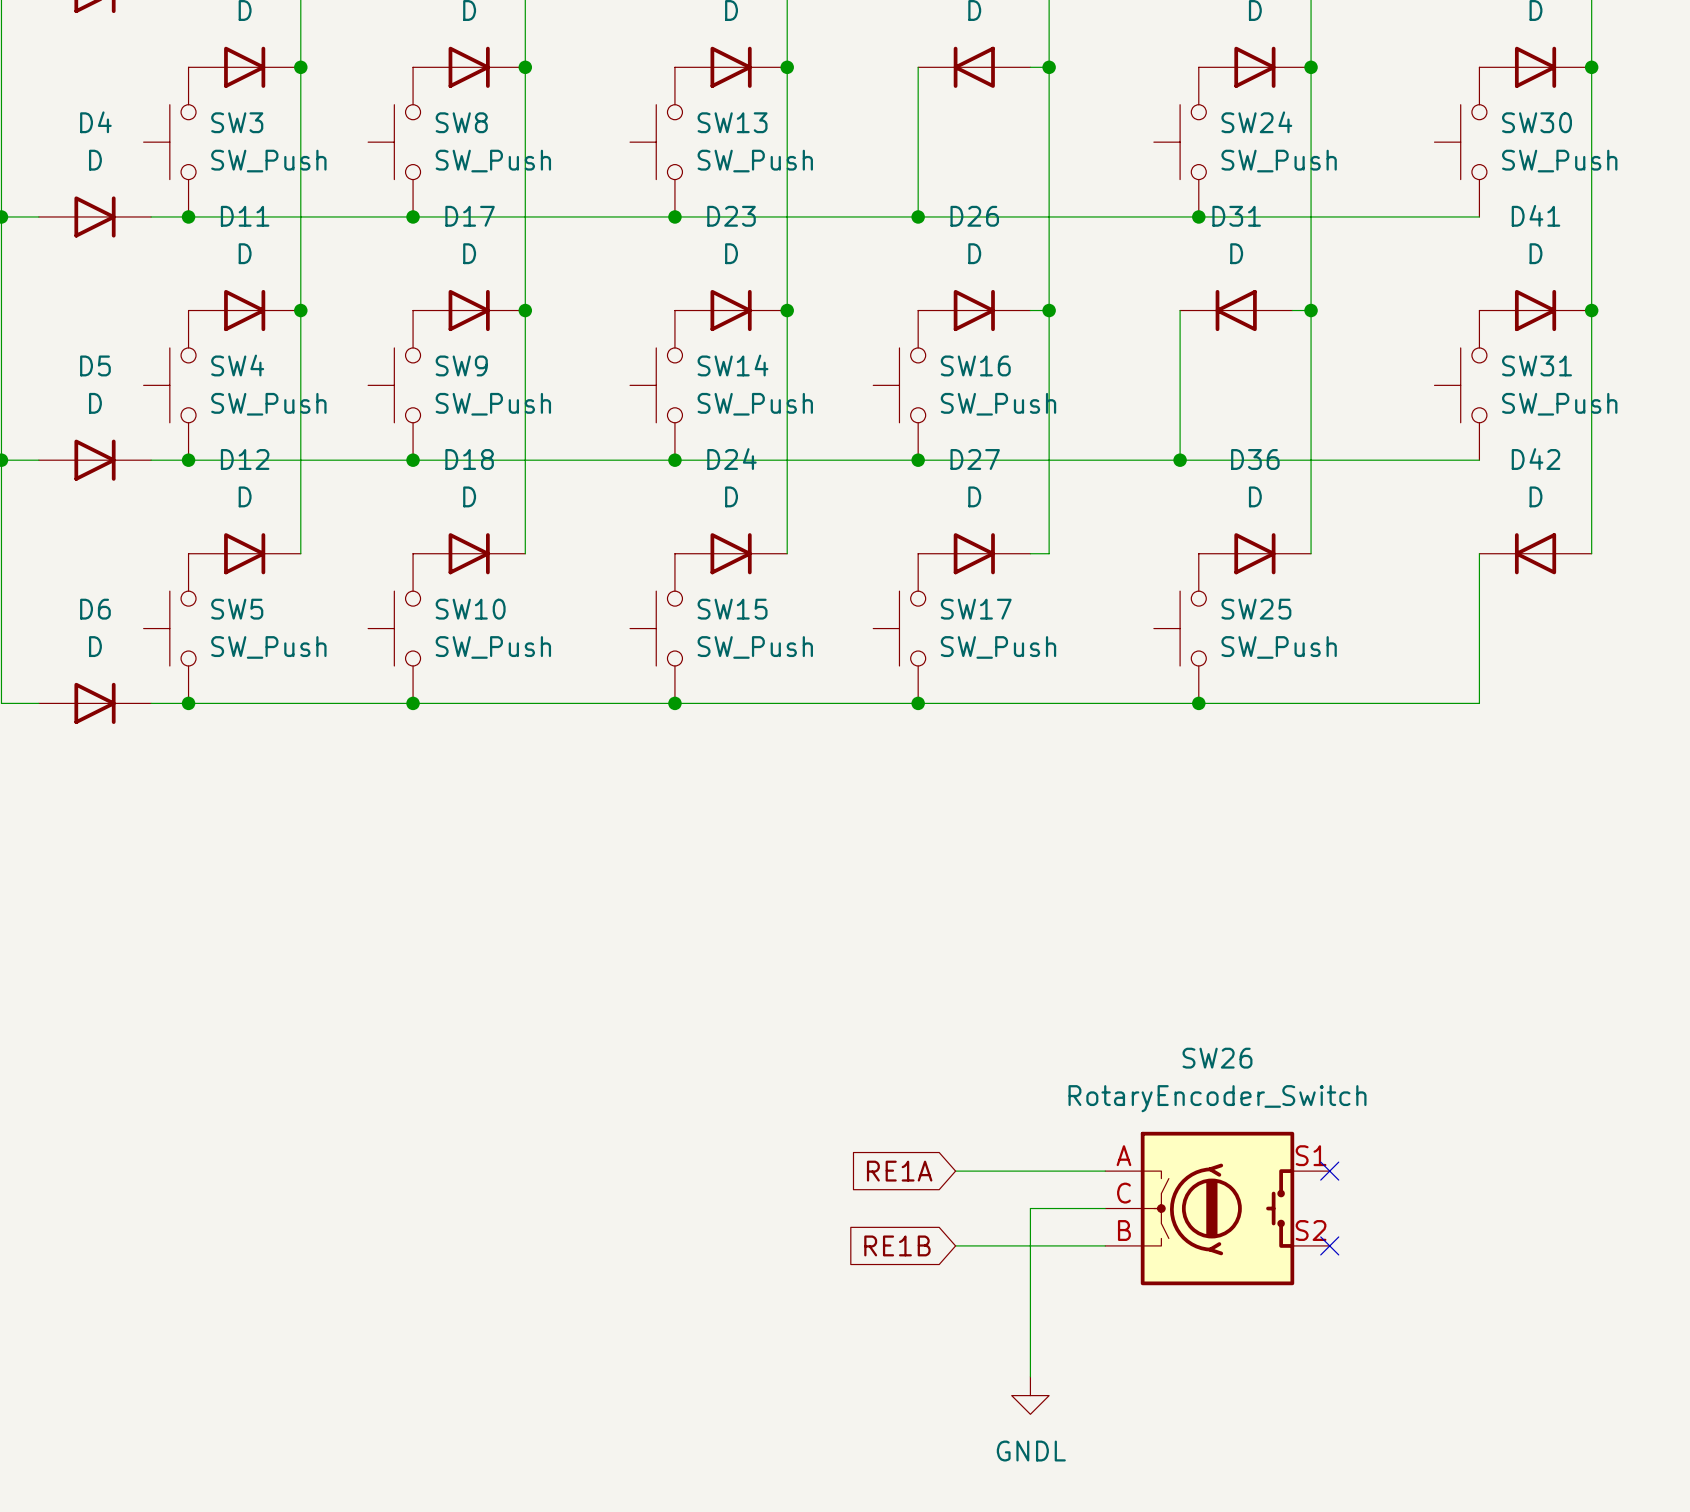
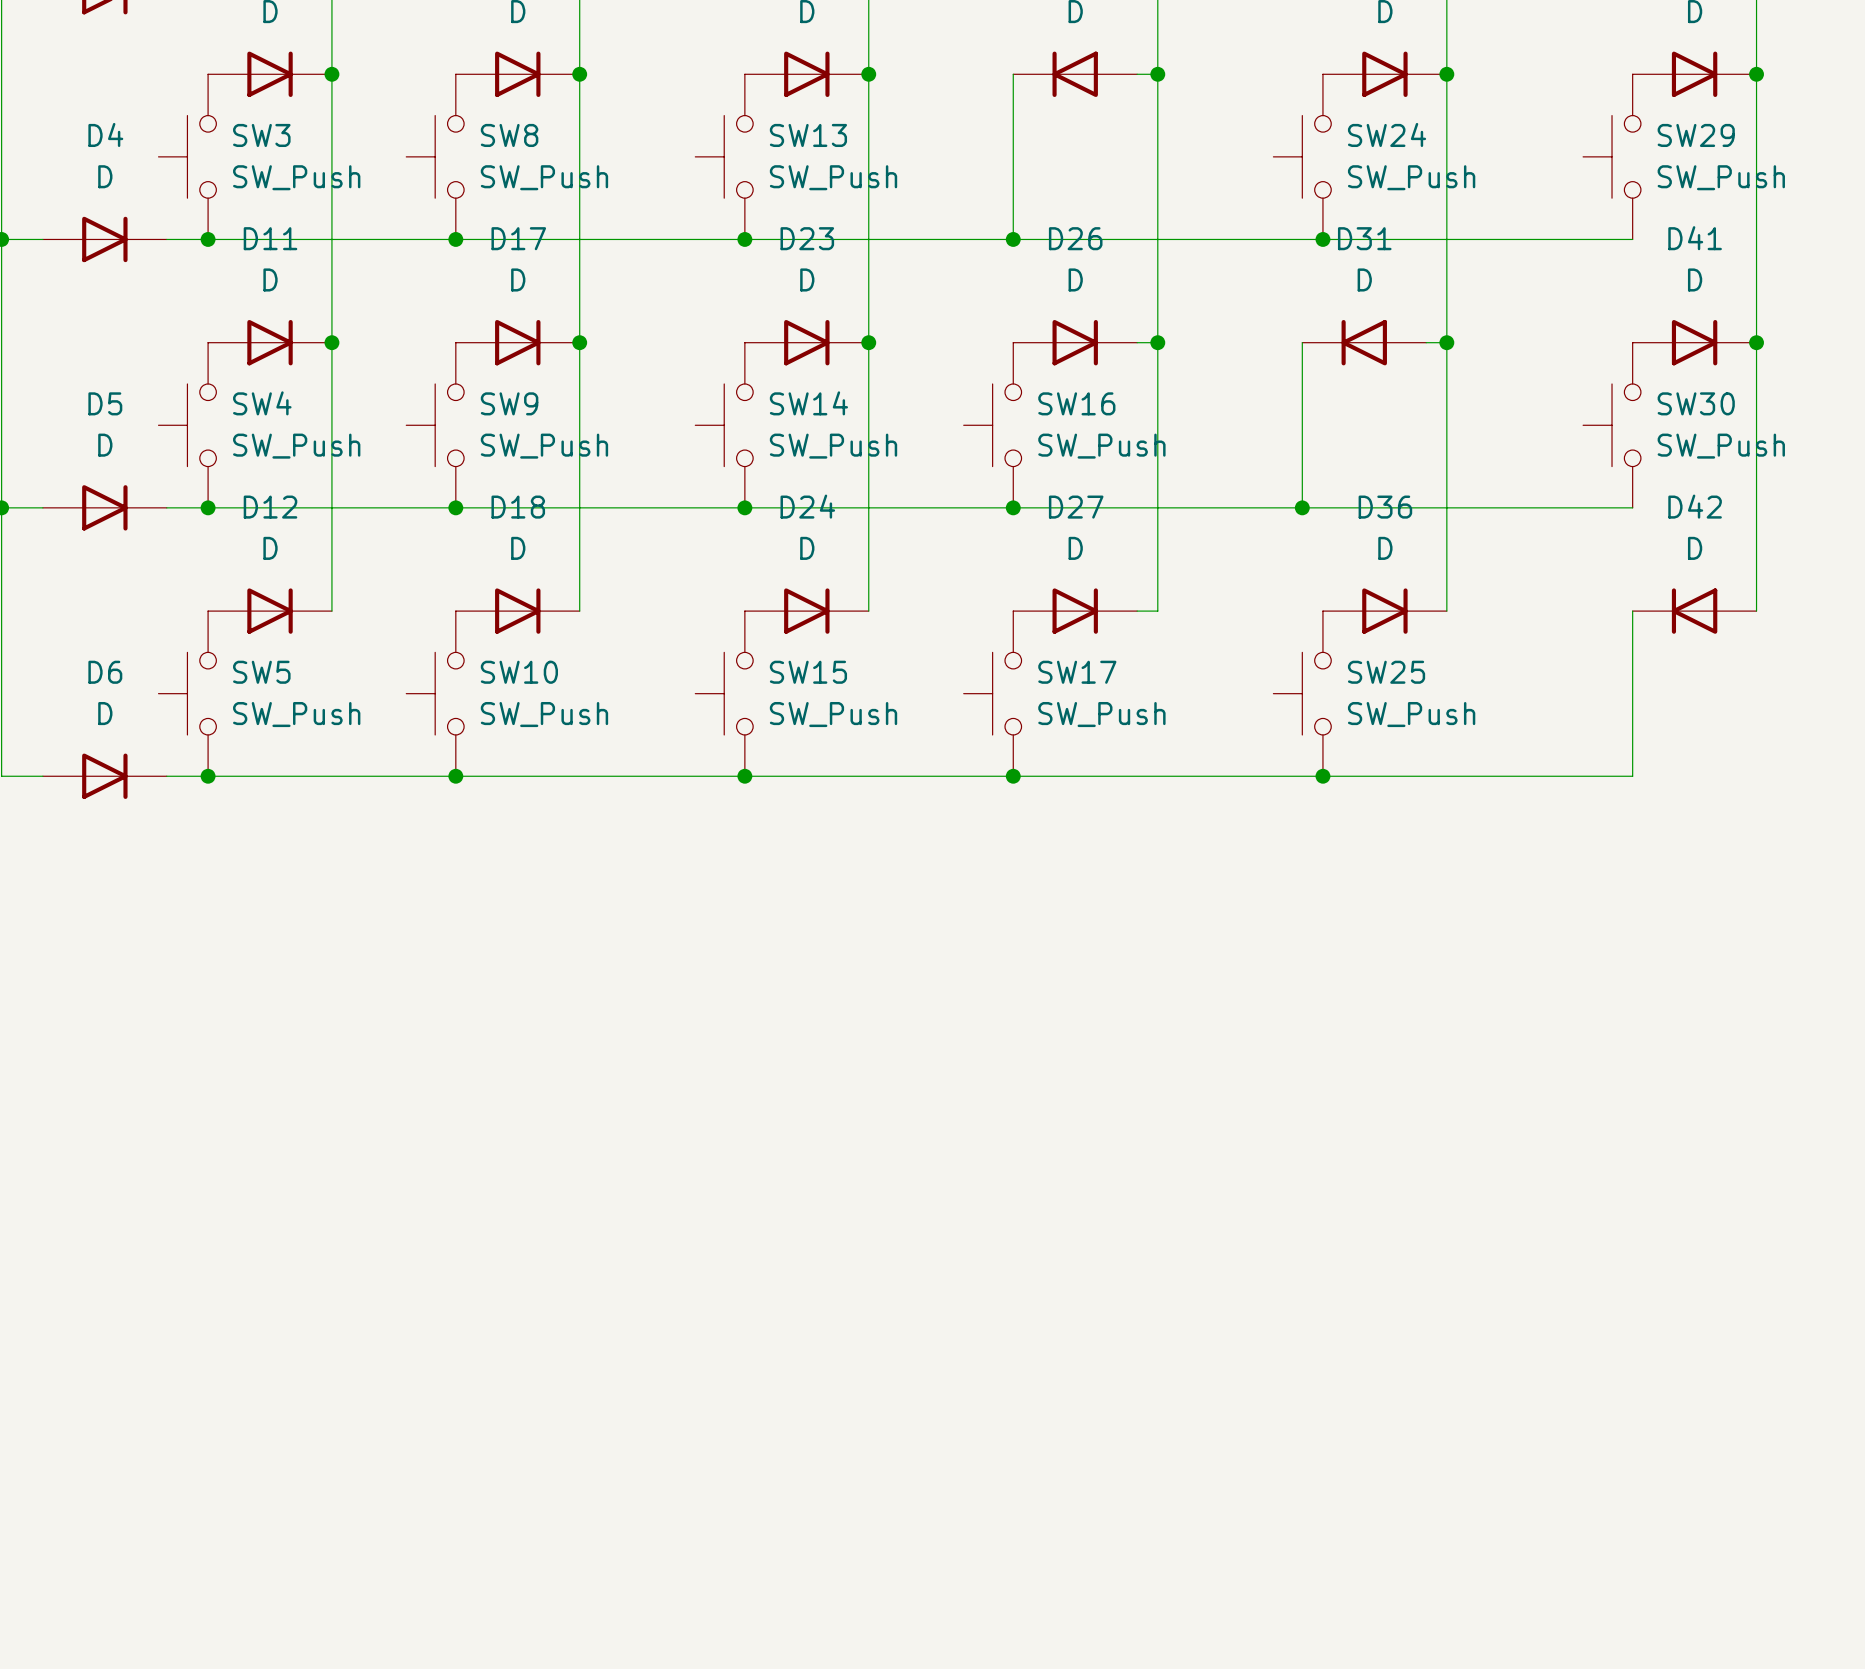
SW30 name: SW30 (1537, 122) -> SW29 (1696, 135)
SW31 name: SW31 (1537, 365) -> SW30 (1696, 403)
global label: RE1A (899, 1171) -> none
wire: (955, 1171) (1105, 1171) -> none
no-connect mark: (1329, 1171) -> none
wire: (1105, 1208) (1030, 1208) (1030, 1376) -> none
SW26: RotaryEncoder_Switch (1217, 1208) -> none
global label: RE1B (897, 1245) -> none
wire: (955, 1245) (1105, 1245) -> none
no-connect mark: (1329, 1245) -> none
power symbol: GNDL (1030, 1395) -> none

